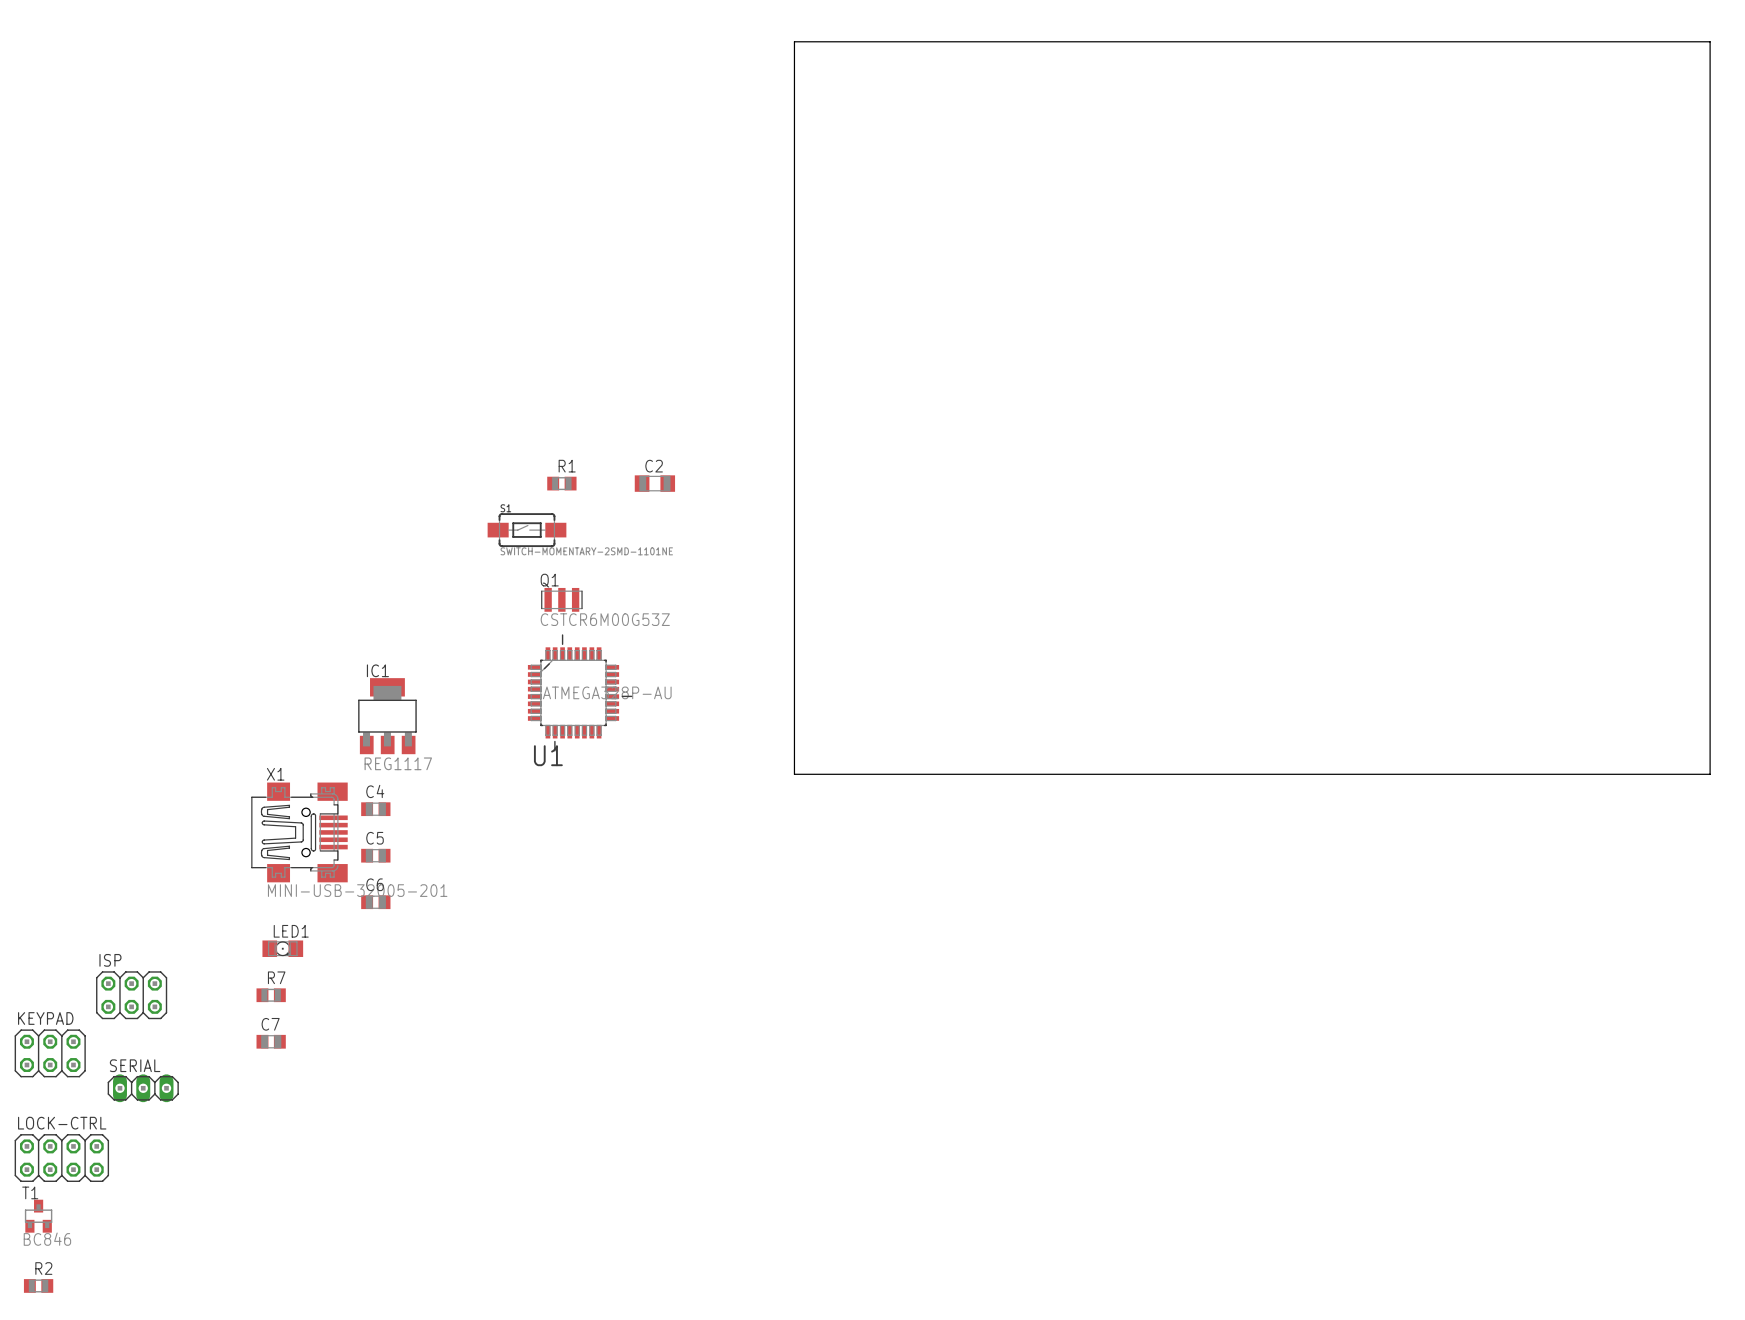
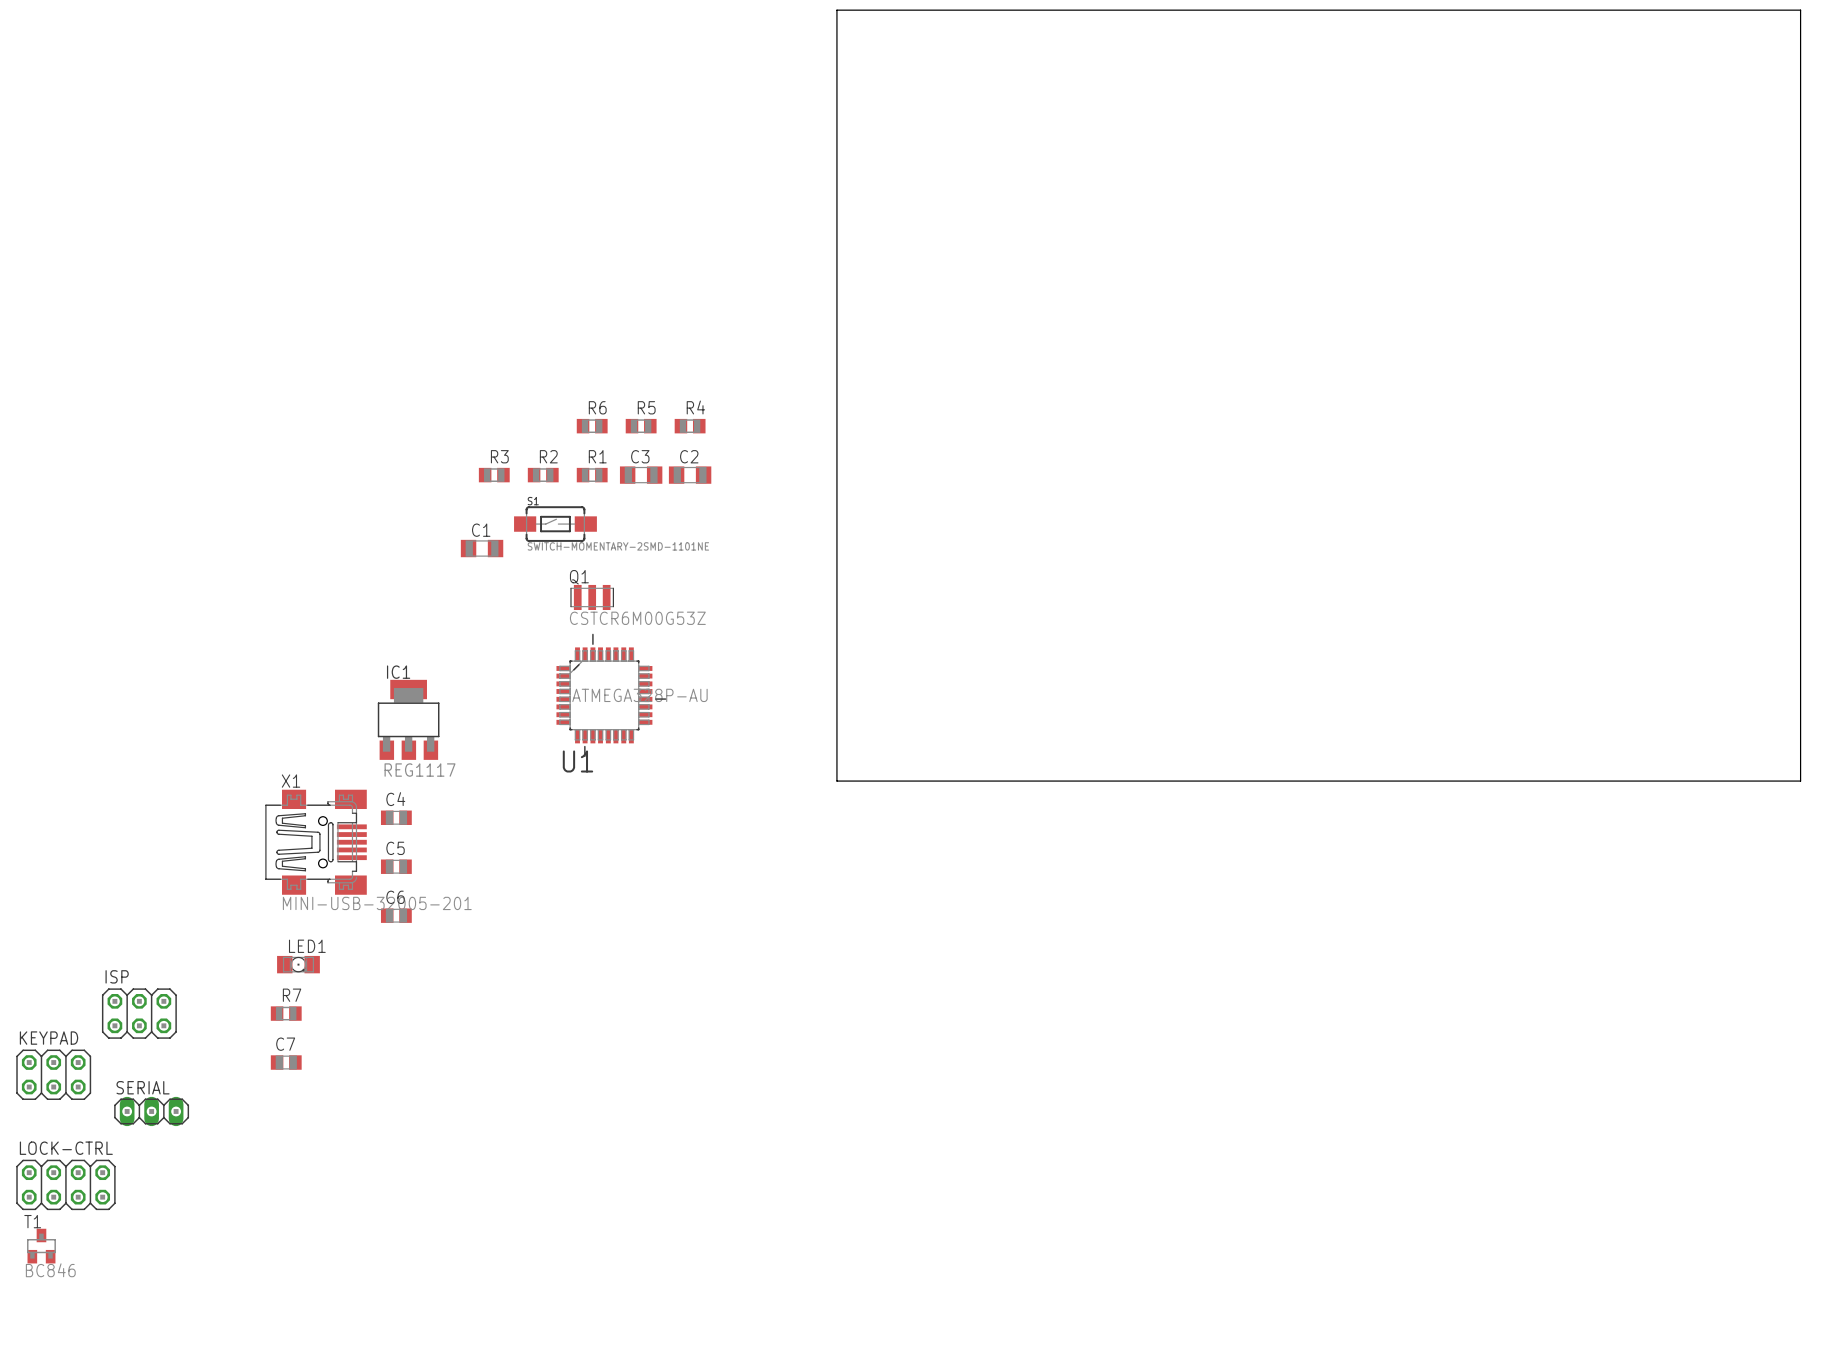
R6: none -> (592, 426)
R5: none -> (641, 426)
R4: none -> (690, 426)
R3: none -> (494, 475)
C3: none -> (641, 475)
C1: none -> (482, 548)
R2 position: (38, 1285) -> (543, 475)

